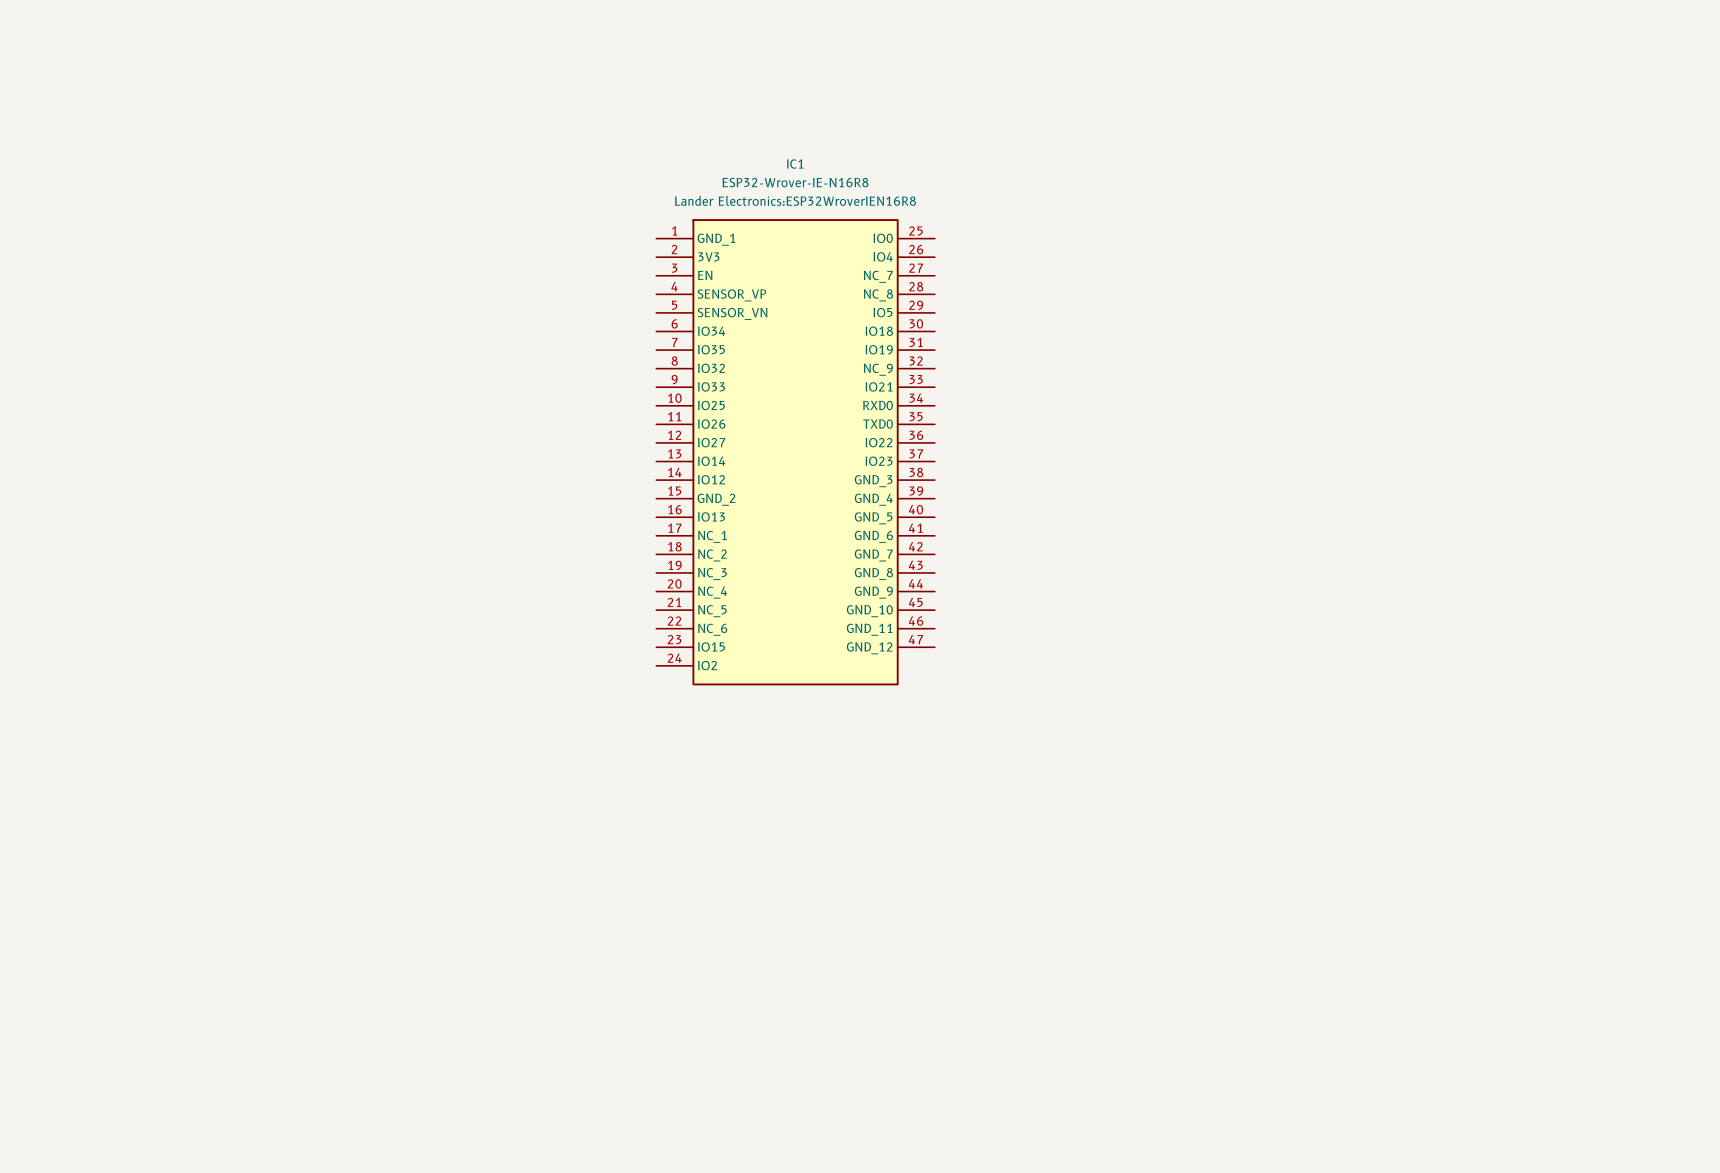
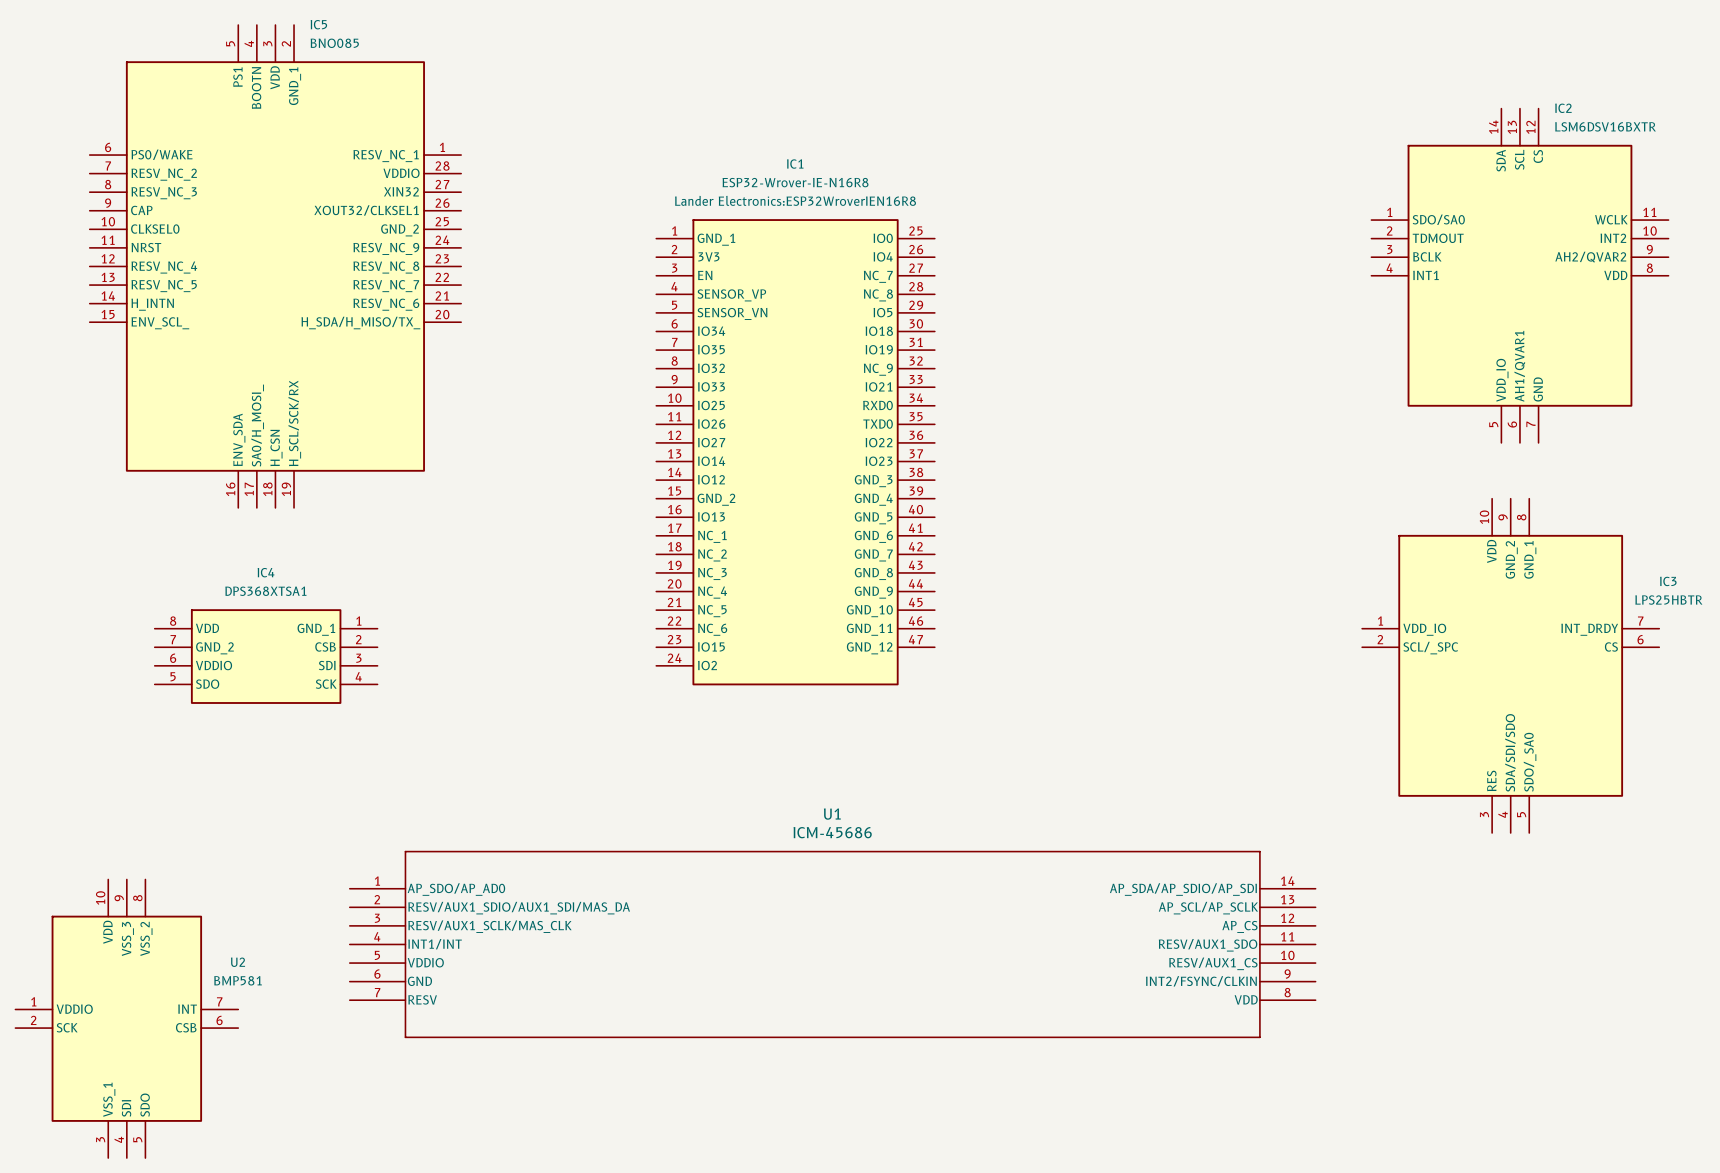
IC5: none -> BNO085 (275, 266)
IC2: none -> LSM6DSV16BXTR (1519, 275)
IC4: none -> DPS368XTSA1 (266, 656)
IC3: none -> LPS25HBTR (1510, 665)
U1: none -> ICM-45686 (832, 944)
U2: none -> BMP581 (126, 1018)

